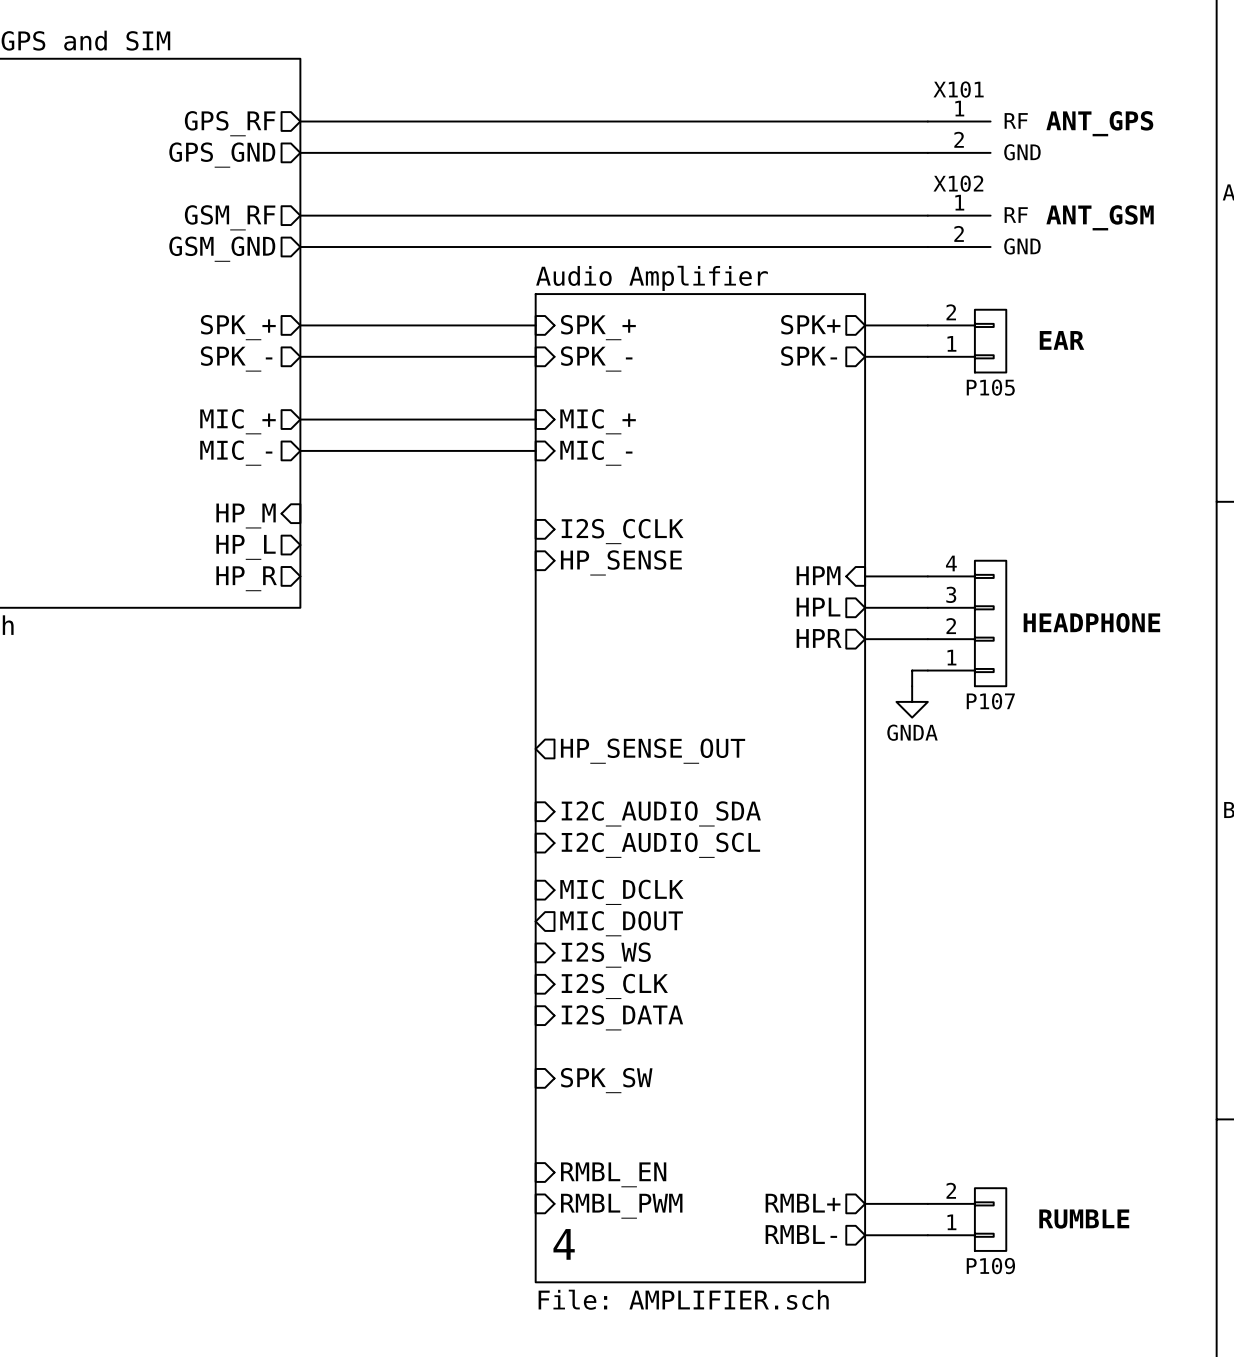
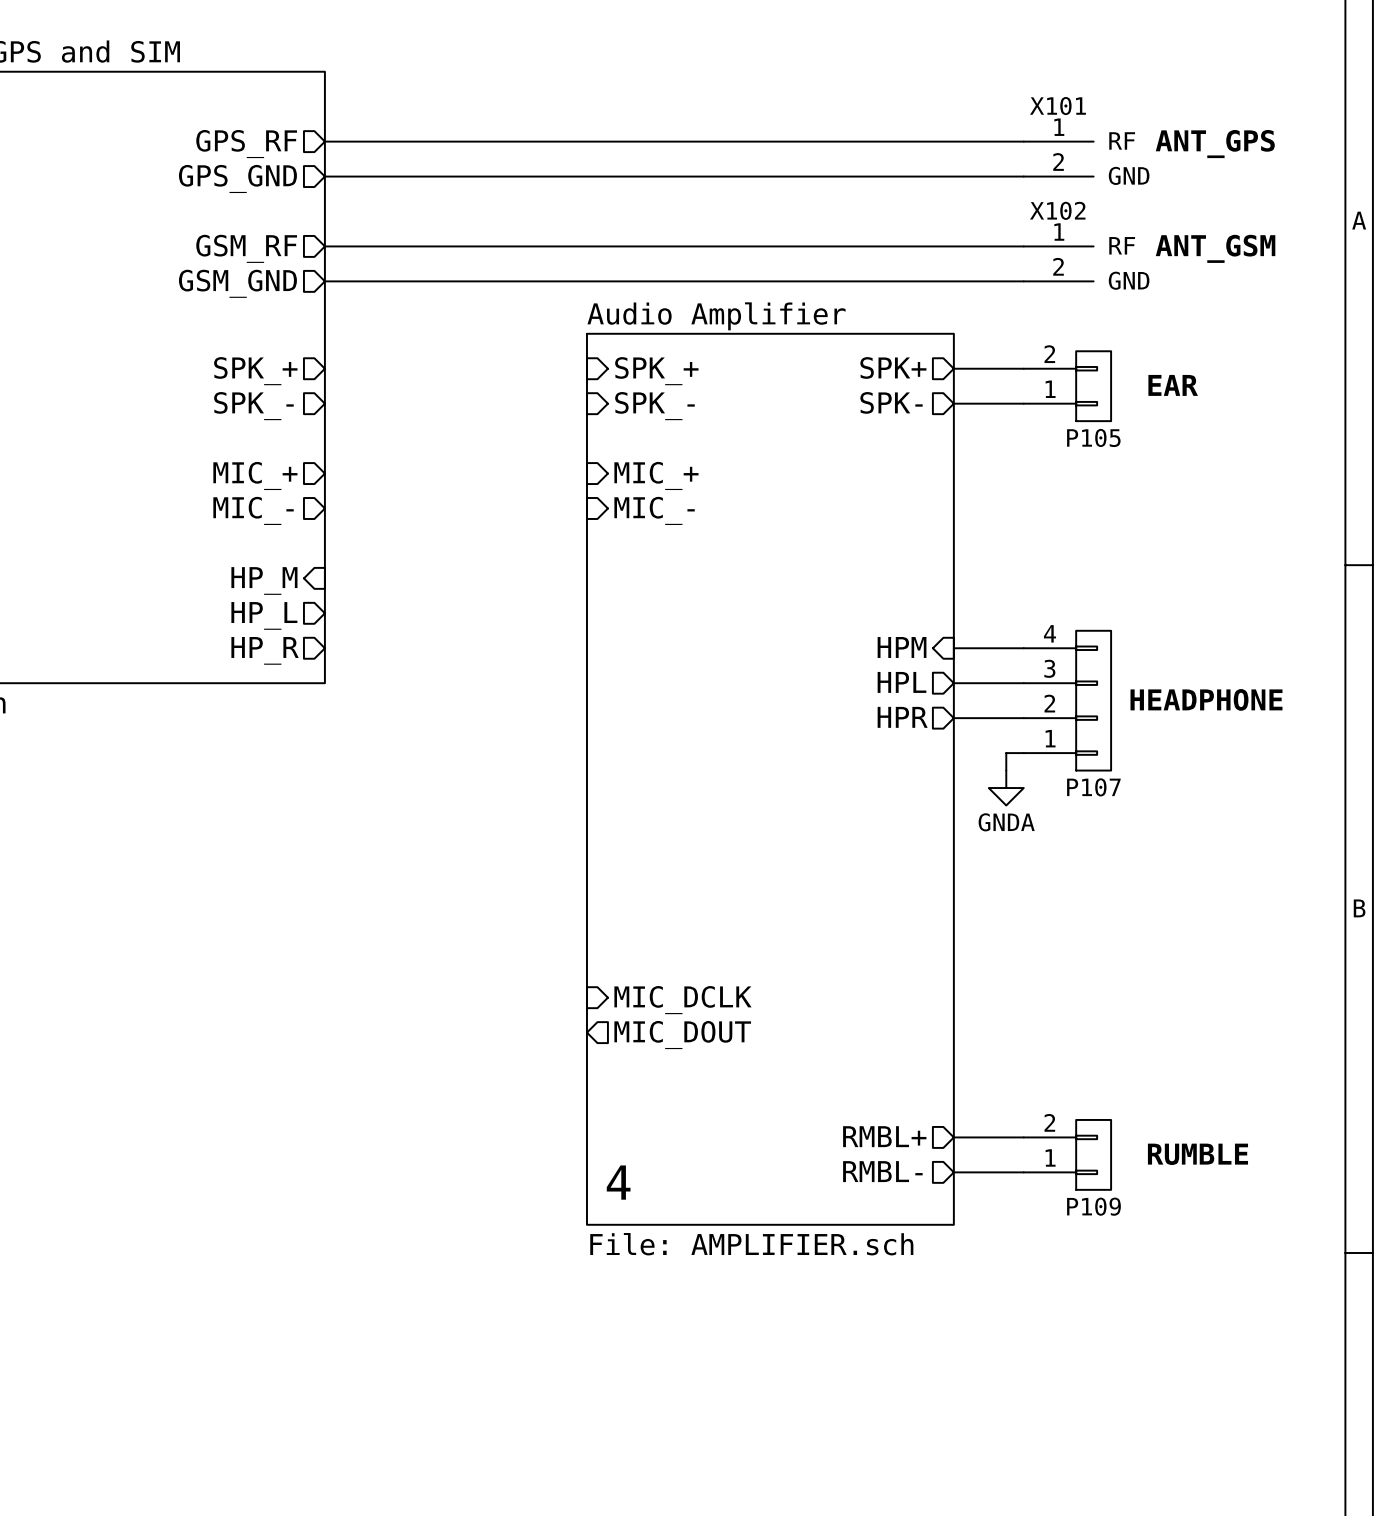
wire: (300, 325) (535, 325) -> none
wire: (300, 356) (535, 356) -> none
wire: (300, 419) (535, 419) -> none
wire: (300, 450) (535, 450) -> none
sheet pin: I2S_CCLK (622, 531) -> none
sheet pin: HP_SENSE (621, 562) -> none
sheet Audio Amplifier: none -> File: AMPLIFIER.sch (770, 779)
sheet pin: HP_SENSE_OUT (653, 751) -> none
sheet Audio Amplifier: File: AMPLIFIER.sch (700, 788) -> none
sheet pin: I2C_AUDIO_SDA (661, 813) -> none
sheet pin: I2C_AUDIO_SCL (660, 845) -> none
sheet pin: I2S_WS (606, 955) -> none
sheet pin: I2S_CLK (614, 986) -> none
sheet pin: I2S_DATA (622, 1017) -> none
sheet pin: SPK_SW (606, 1080) -> none
sheet pin: RMBL_EN (613, 1174) -> none
sheet pin position: RMBL+ (803, 1203) -> RMBL+ (884, 1136)
wire: (865, 1203) (927, 1203) -> (953, 1137) (1023, 1137)
sheet pin: RMBL_PWM (621, 1206) -> none
P109 position: (967, 1219) -> (1067, 1154)
sheet pin position: RMBL- (801, 1234) -> RMBL- (882, 1171)
wire: (865, 1235) (927, 1235) -> (953, 1172) (1023, 1172)
text position: 4 (564, 1244) -> 4 (618, 1182)

